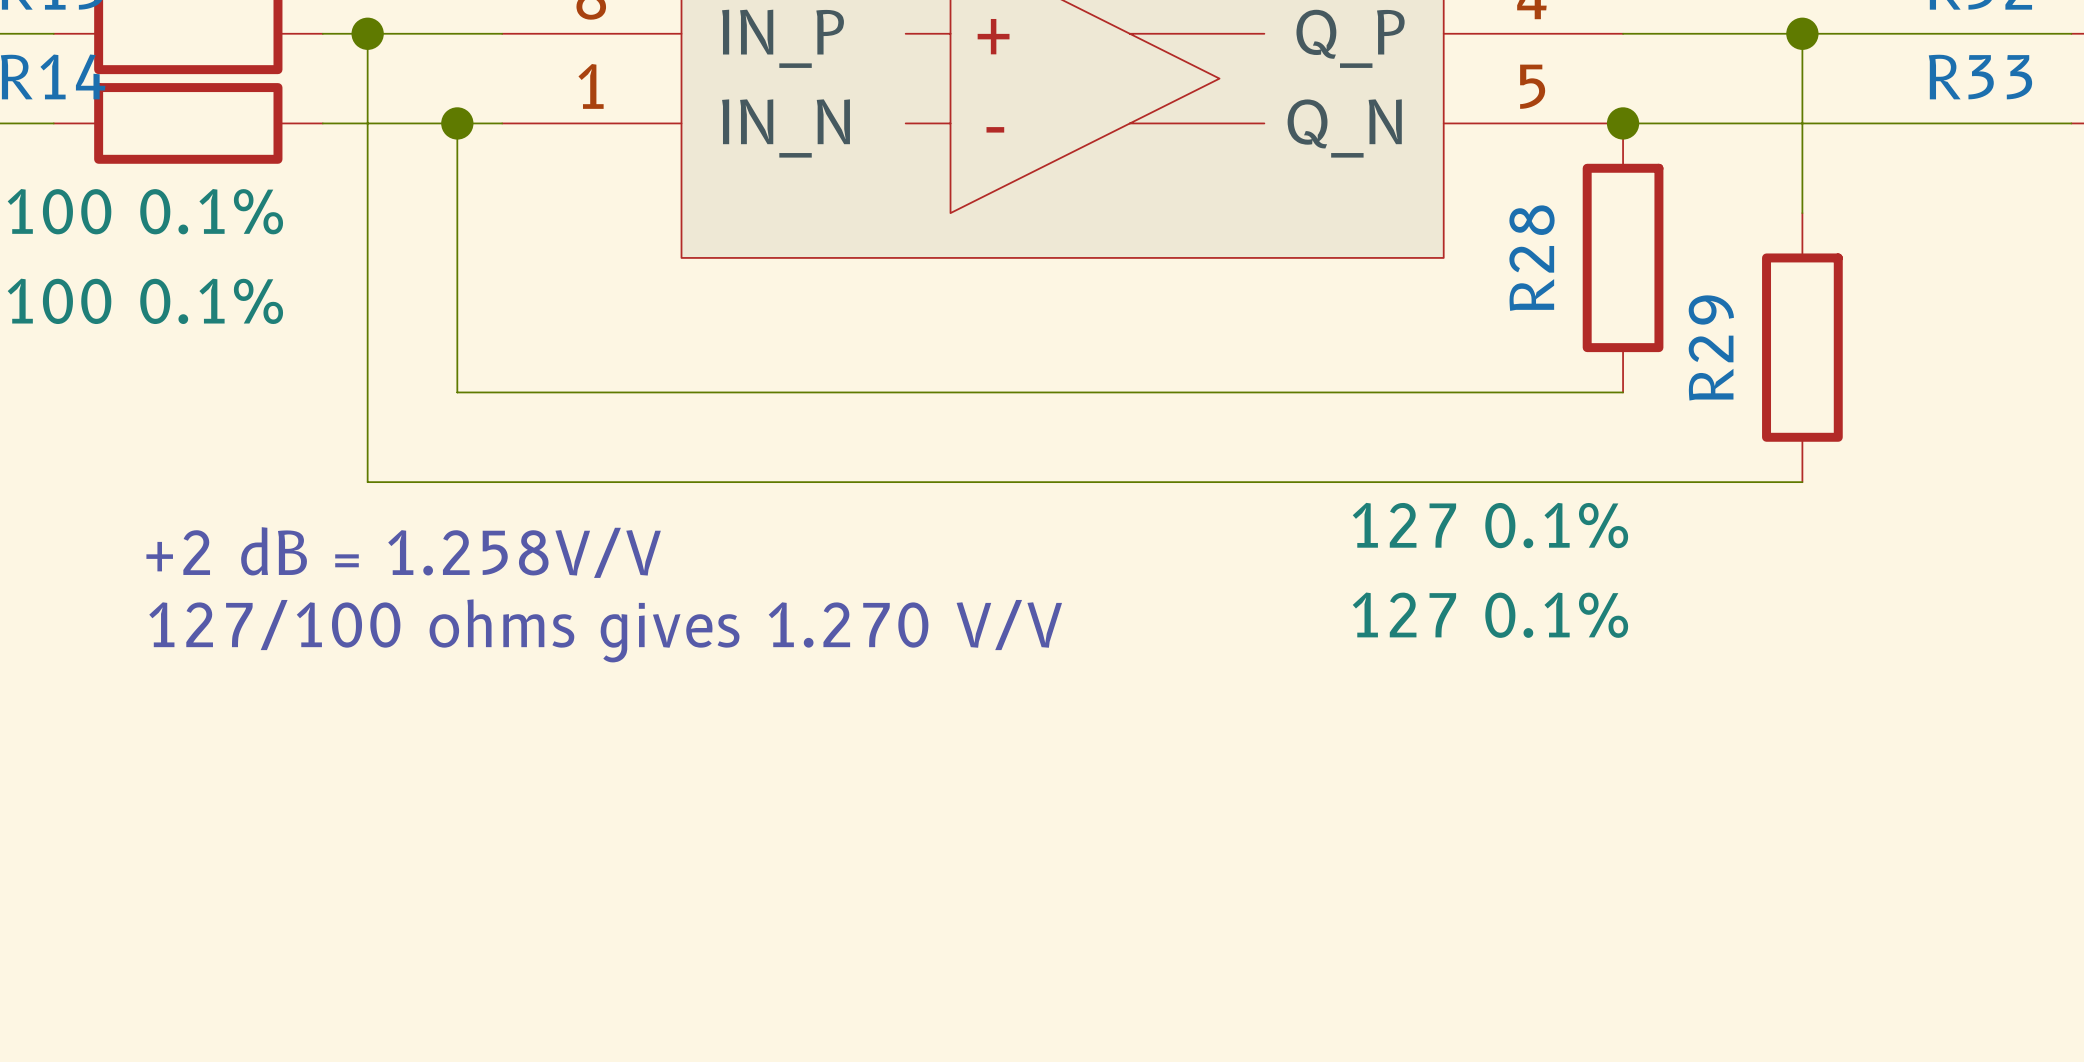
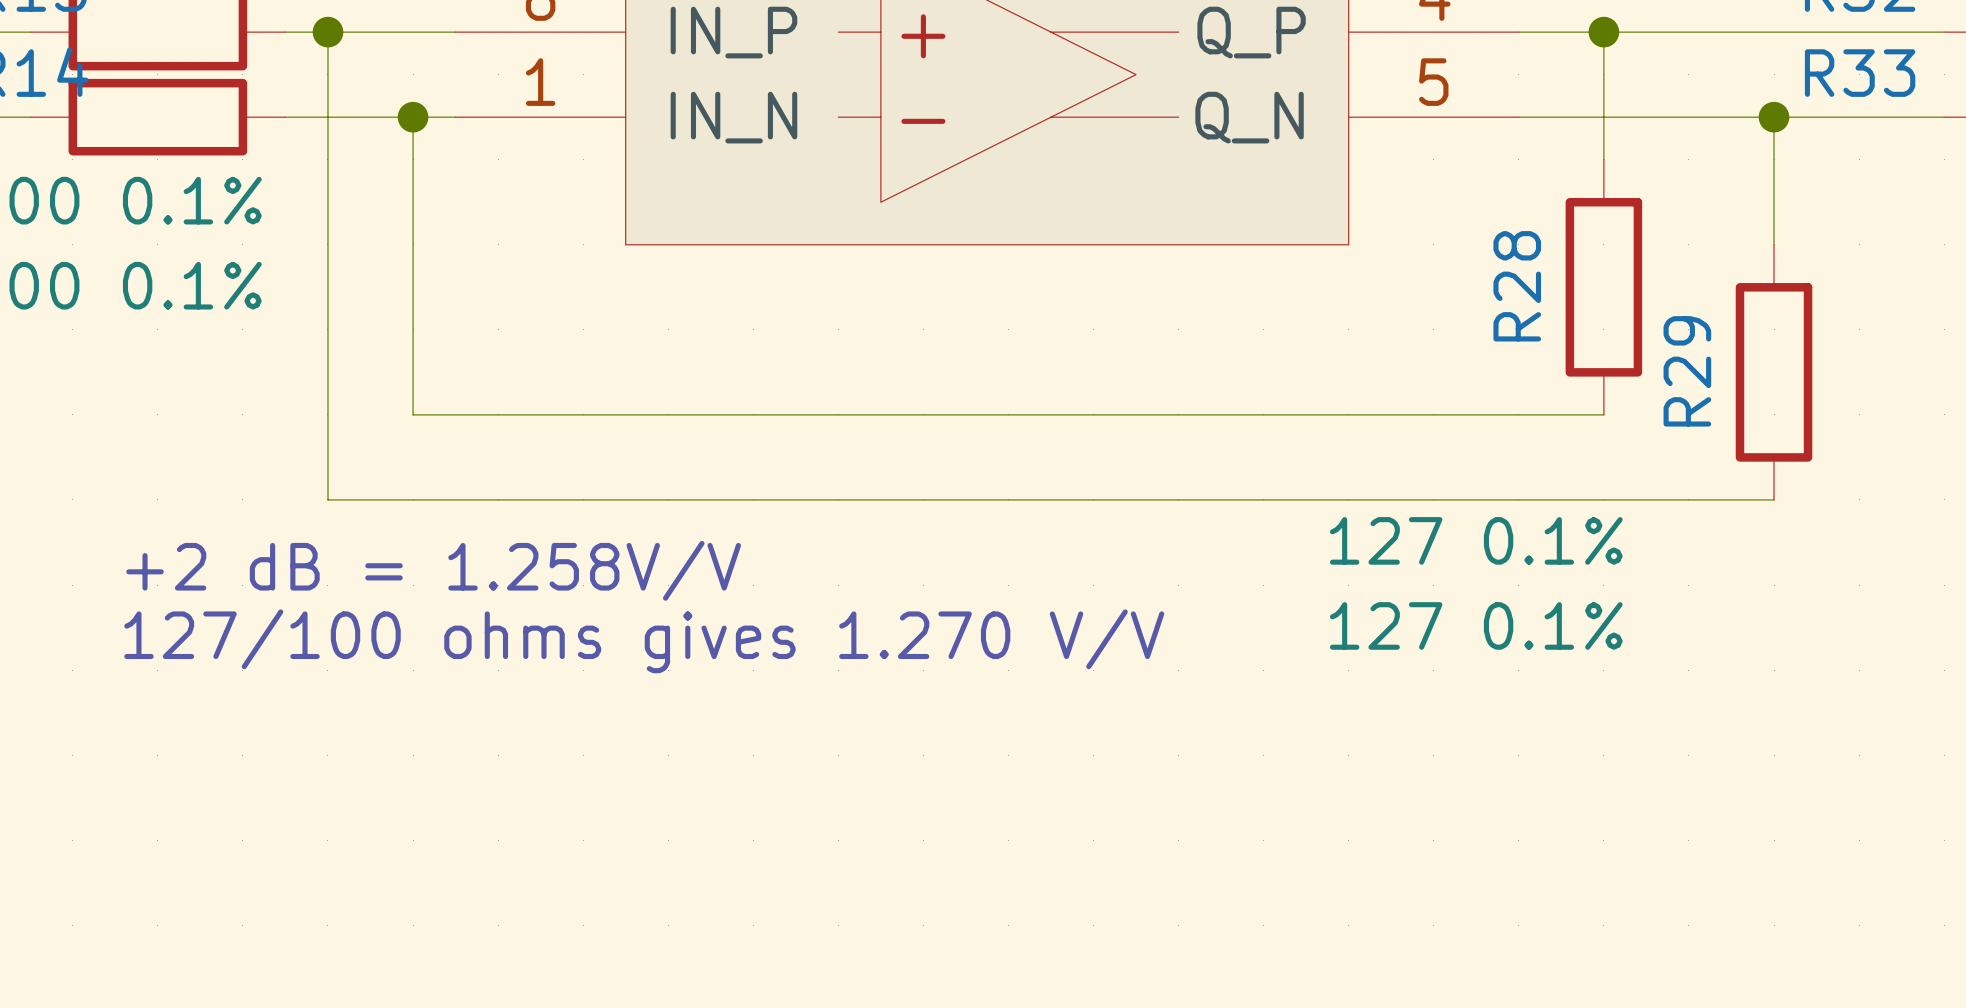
wire: none -> (1603, 32) (1603, 159)
junction: none -> (1603, 32)
wire: (1802, 33) (1802, 213) -> none
junction: (1802, 33) -> none
junction: (1623, 123) -> none
wire: none -> (1774, 117) (1774, 244)
junction: none -> (1774, 117)
R28 position: (1623, 257) -> (1603, 287)
R29 position: (1802, 347) -> (1774, 372)
wire: (457, 392) (1623, 392) -> (413, 372) (413, 414) (1603, 414)
wire: (367, 482) (1802, 482) -> (327, 457) (327, 499) (1774, 499)
text position: +2 dB = 1.258V/V (403, 552) -> +2 dB = 1.258V/V (433, 570)
text position: 127/100 ohms gives 1.270 V/V (605, 630) -> 127/100 ohms gives 1.270 V/V (644, 641)

